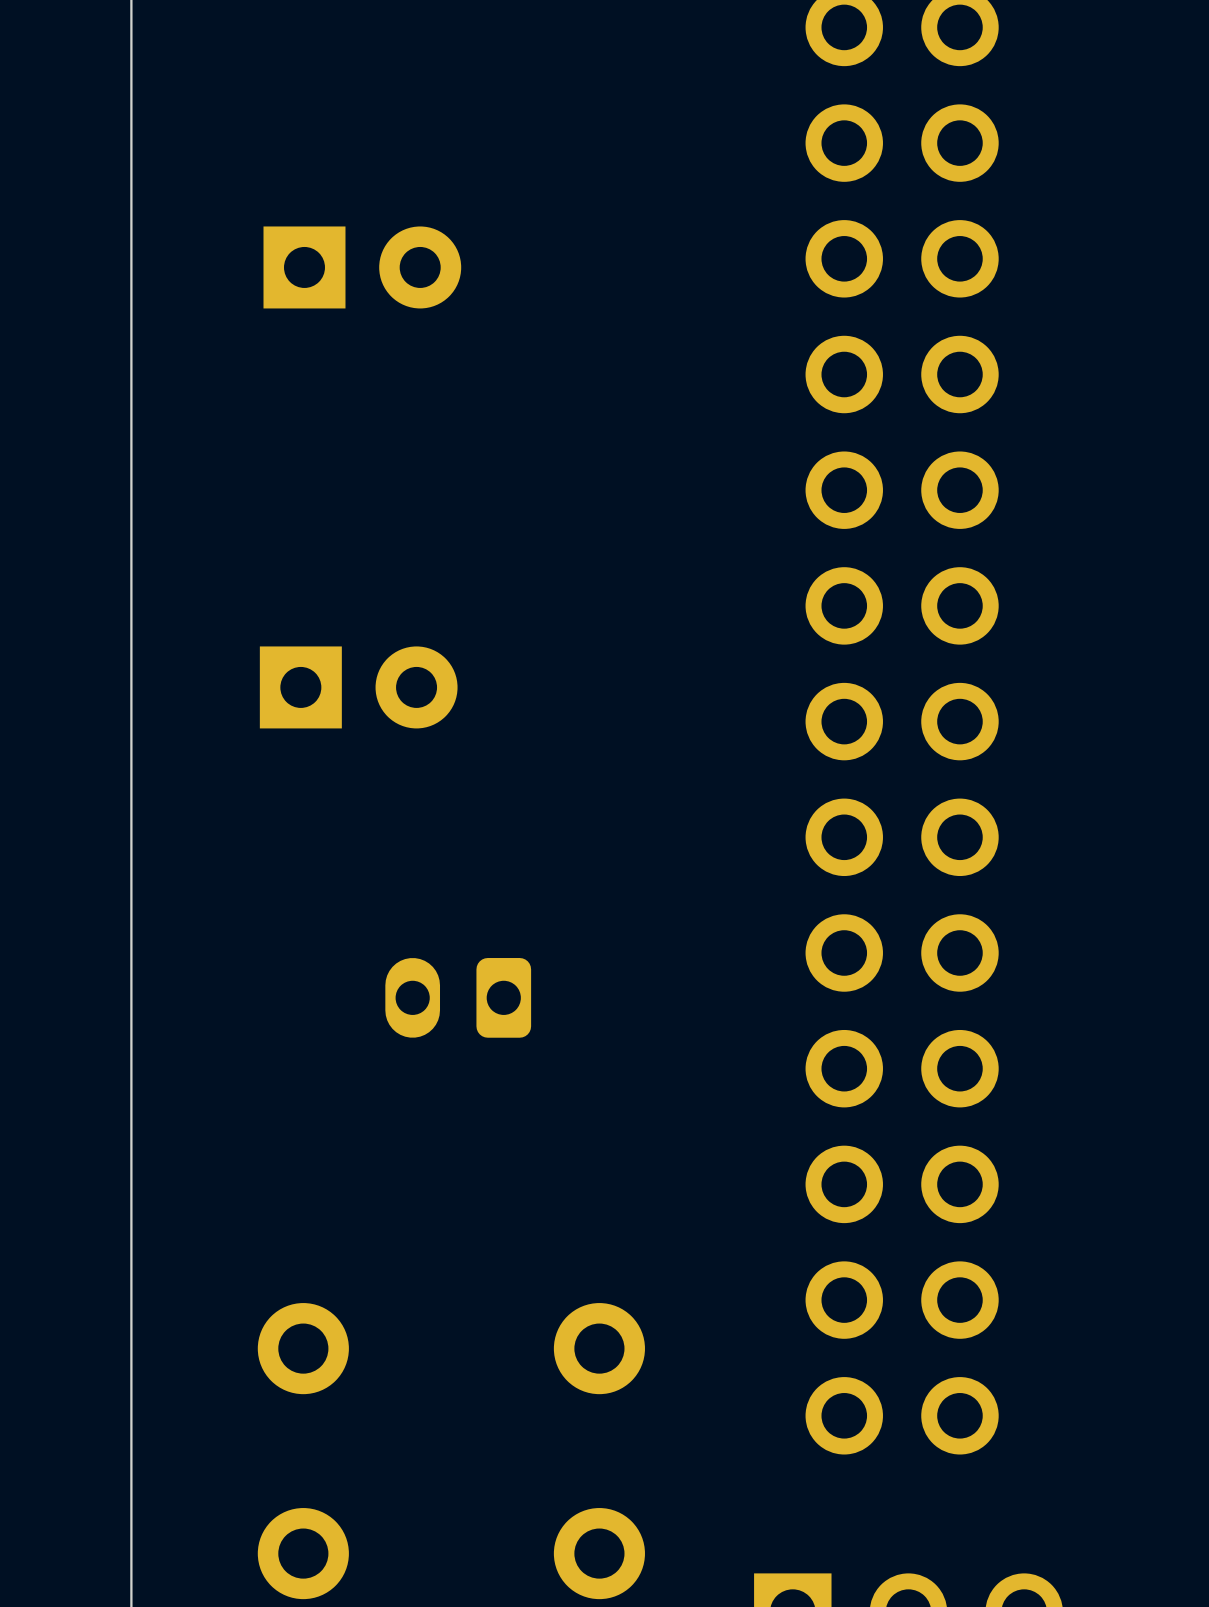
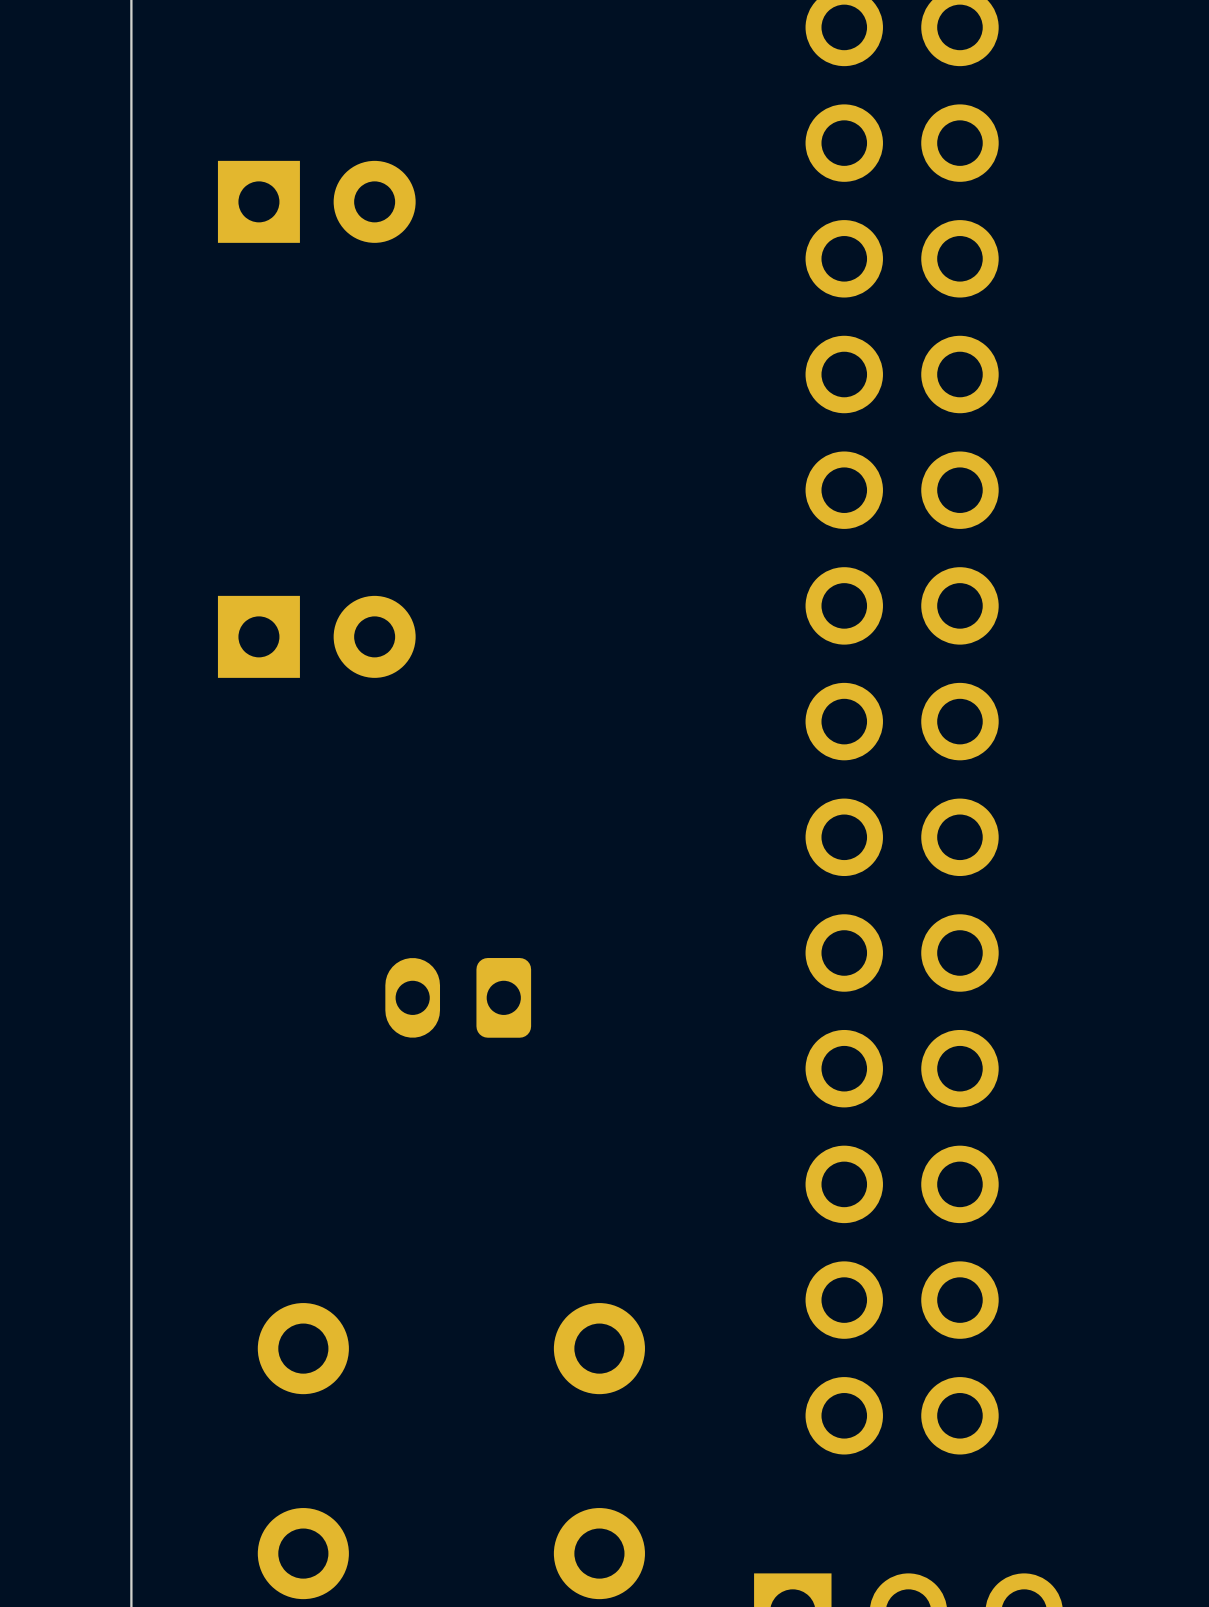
part position: (362, 267) -> (316, 201)
part position: (358, 687) -> (316, 636)

